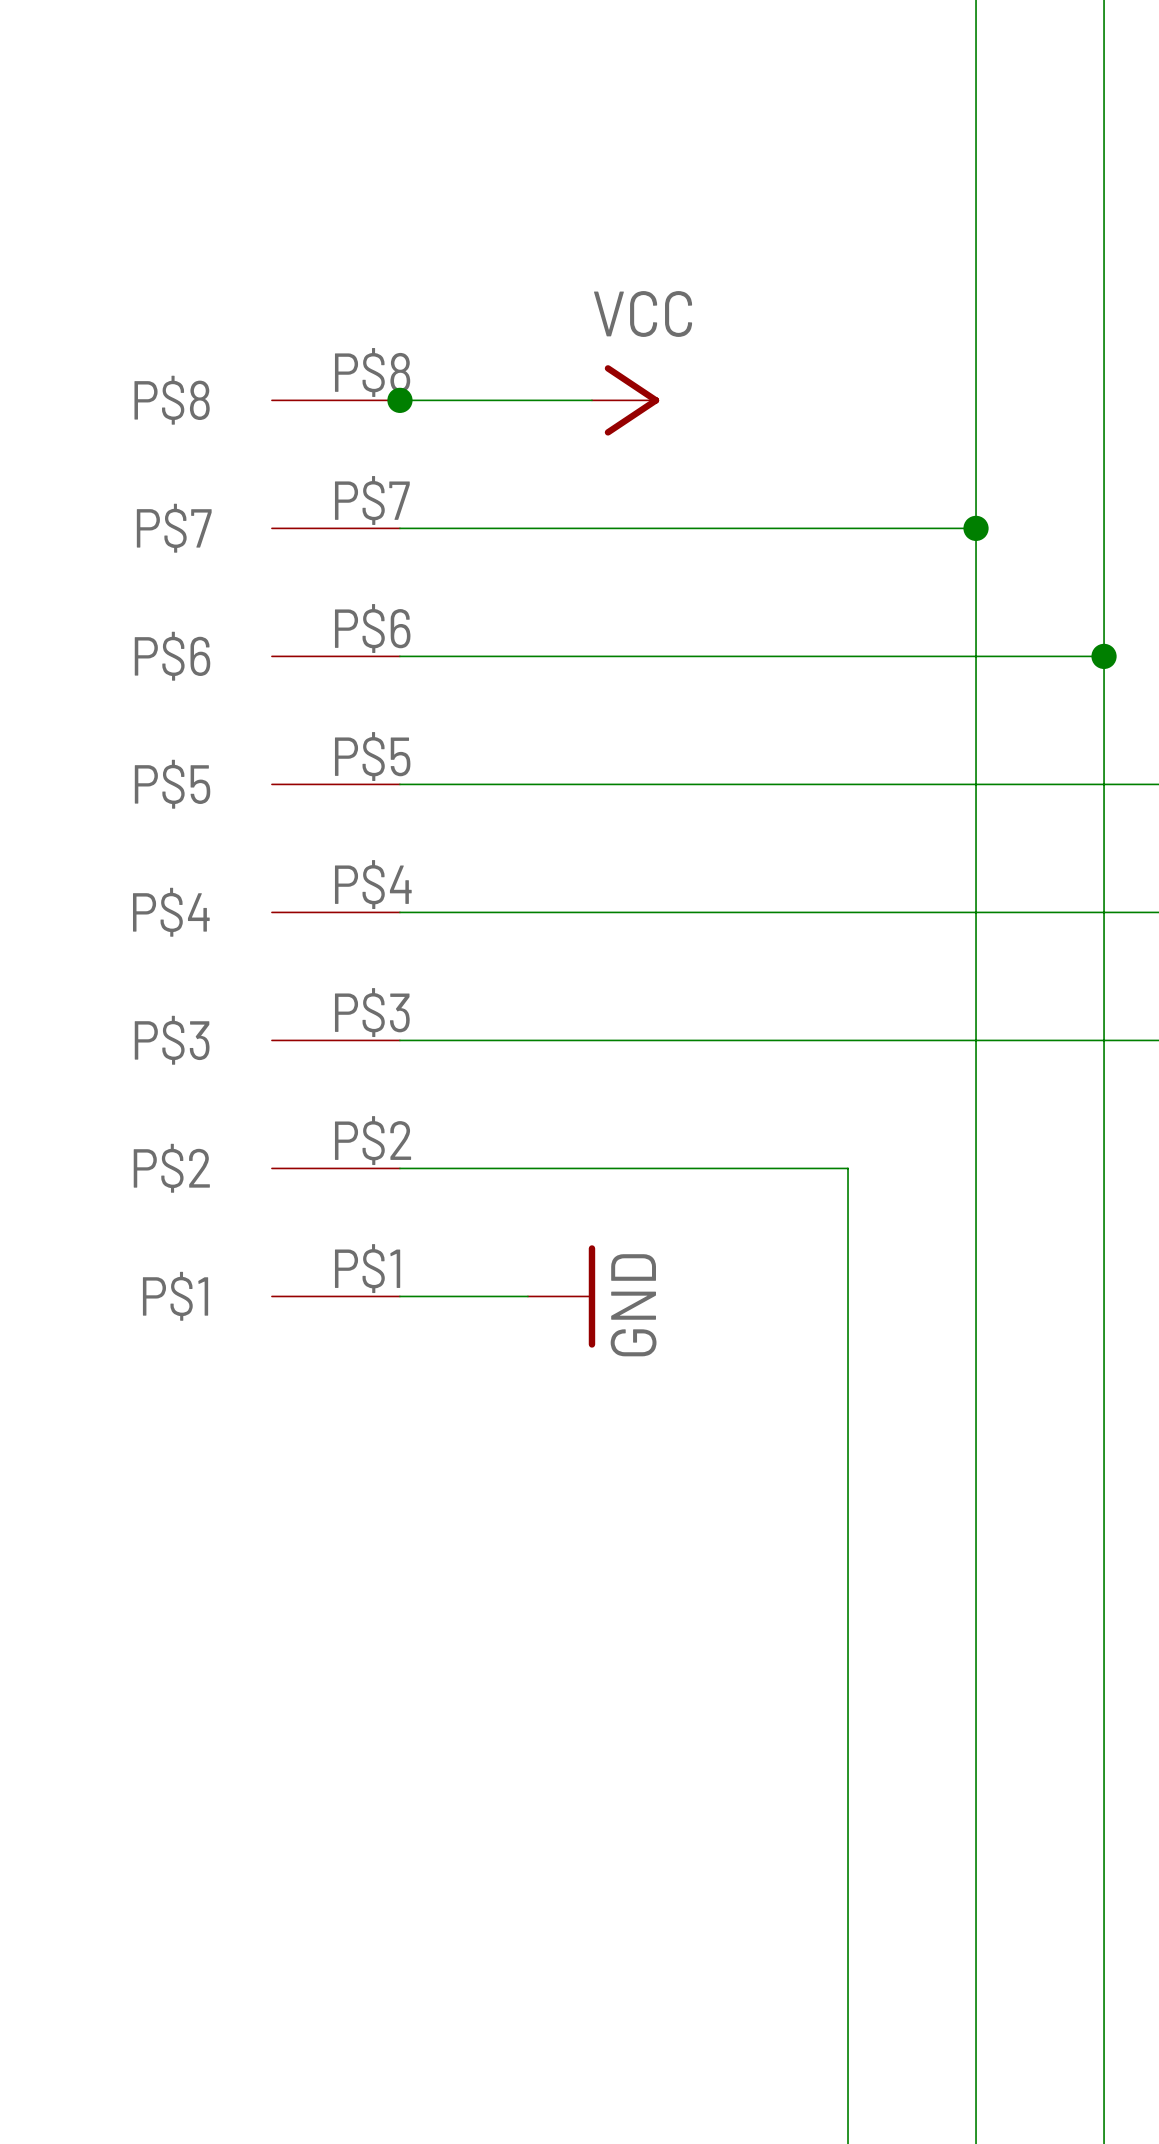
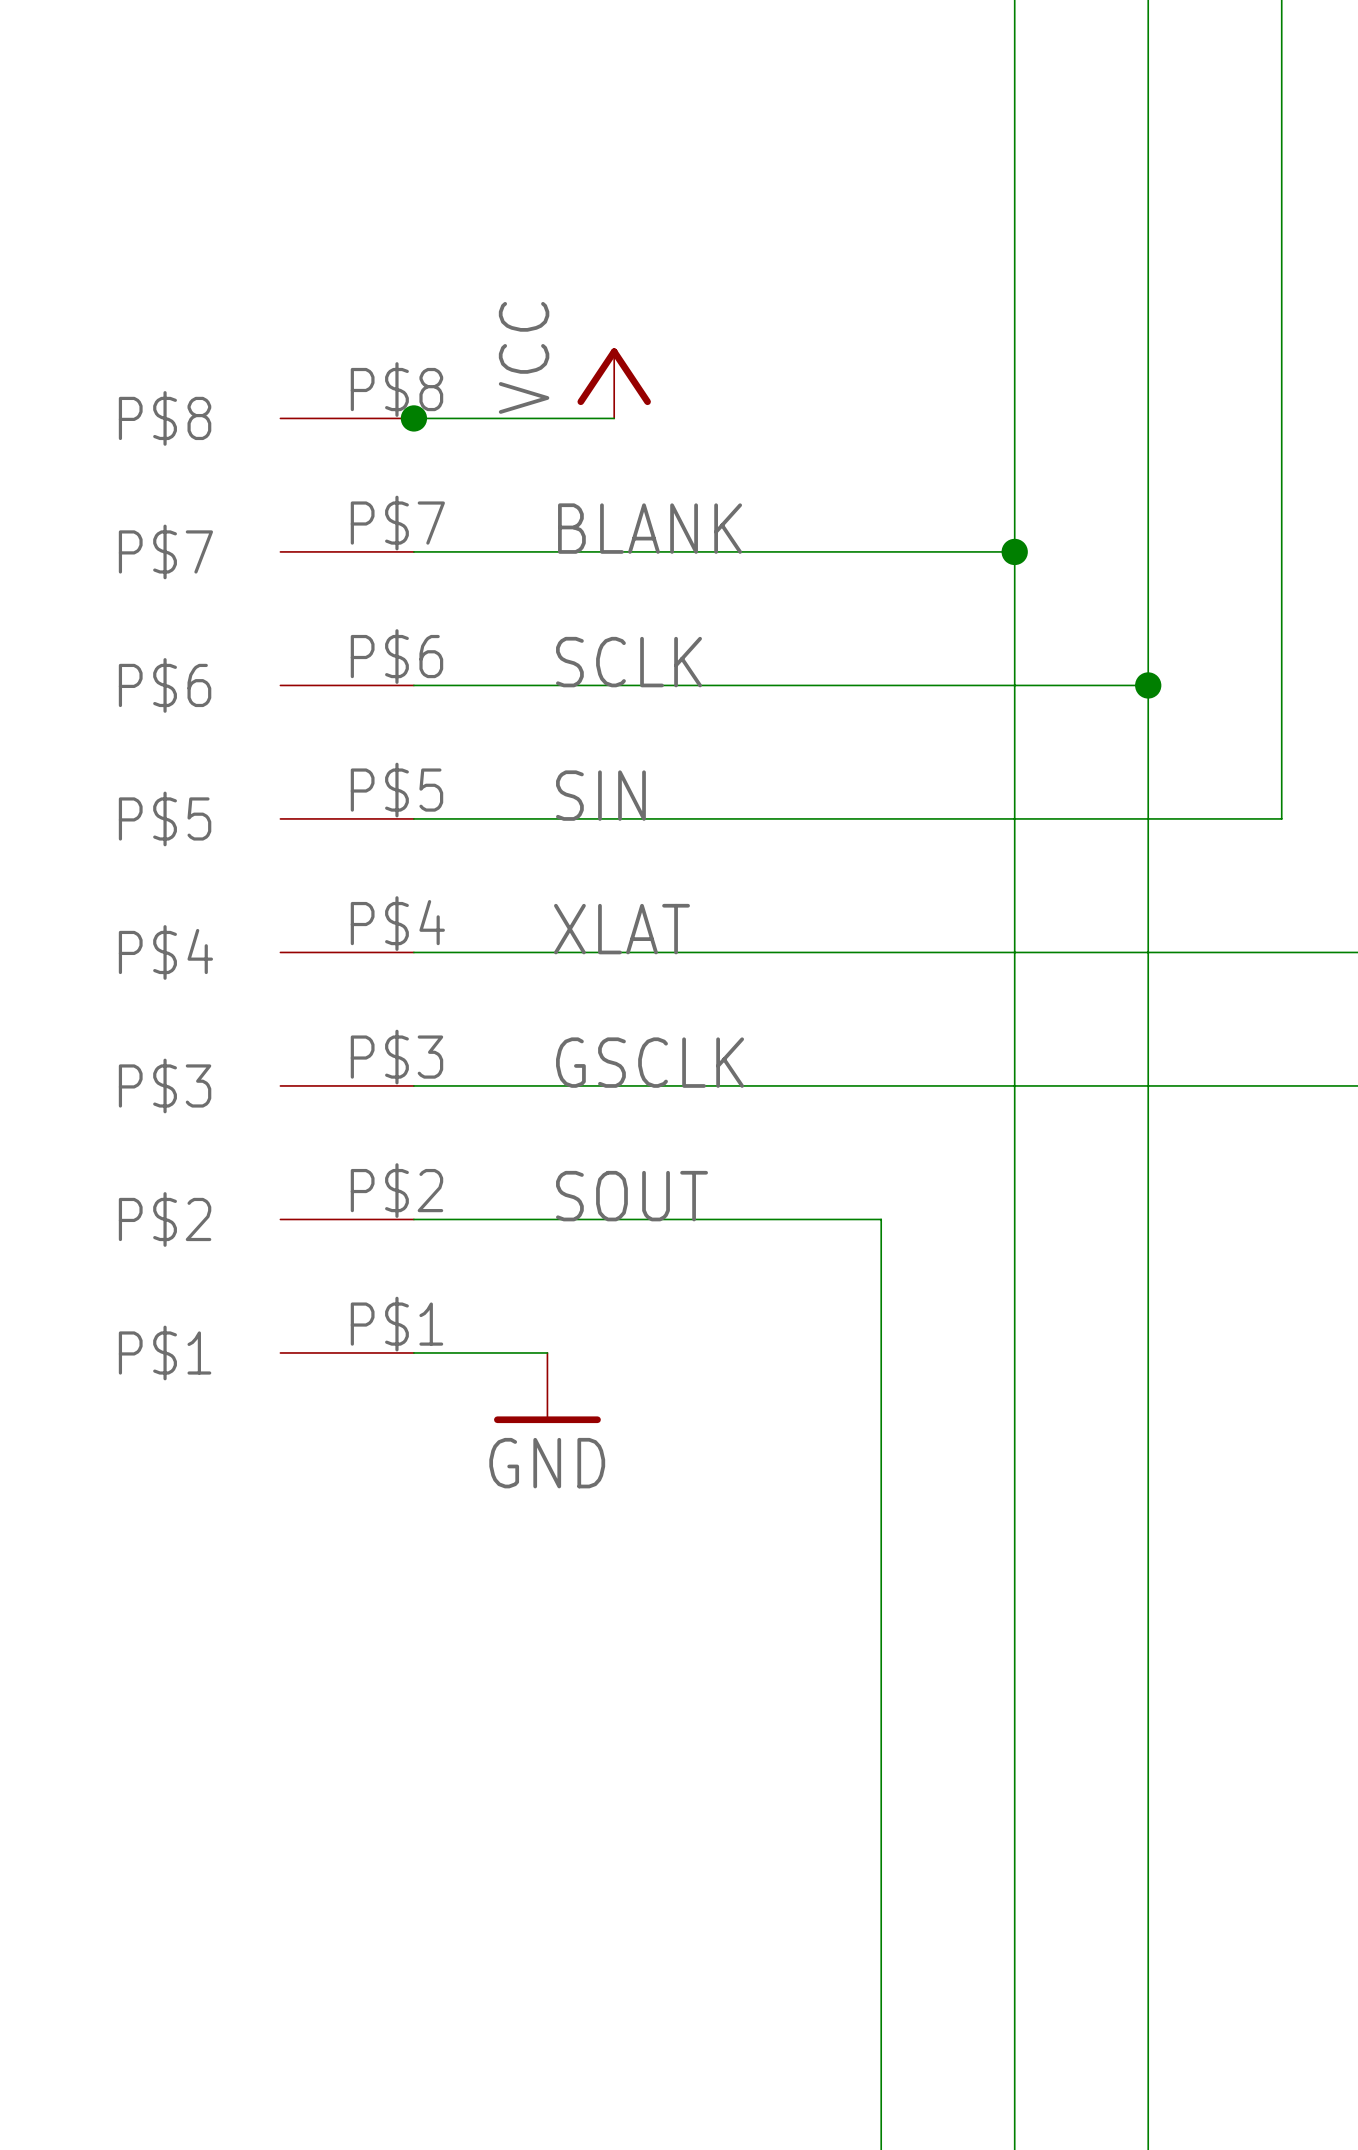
power symbol position: VCC (625, 400) -> VCC (614, 383)
power symbol rotation: 0° (631, 400) -> 90° counterclockwise (614, 376)
label: none -> BLANK (650, 528)
label: none -> SCLK (628, 662)
label: none -> SIN (600, 795)
label: none -> XLAT (621, 929)
label: none -> GSCLK (650, 1062)
label: none -> SOUT (632, 1196)
power symbol rotation: 0° (591, 1296) -> 90° clockwise (547, 1419)

